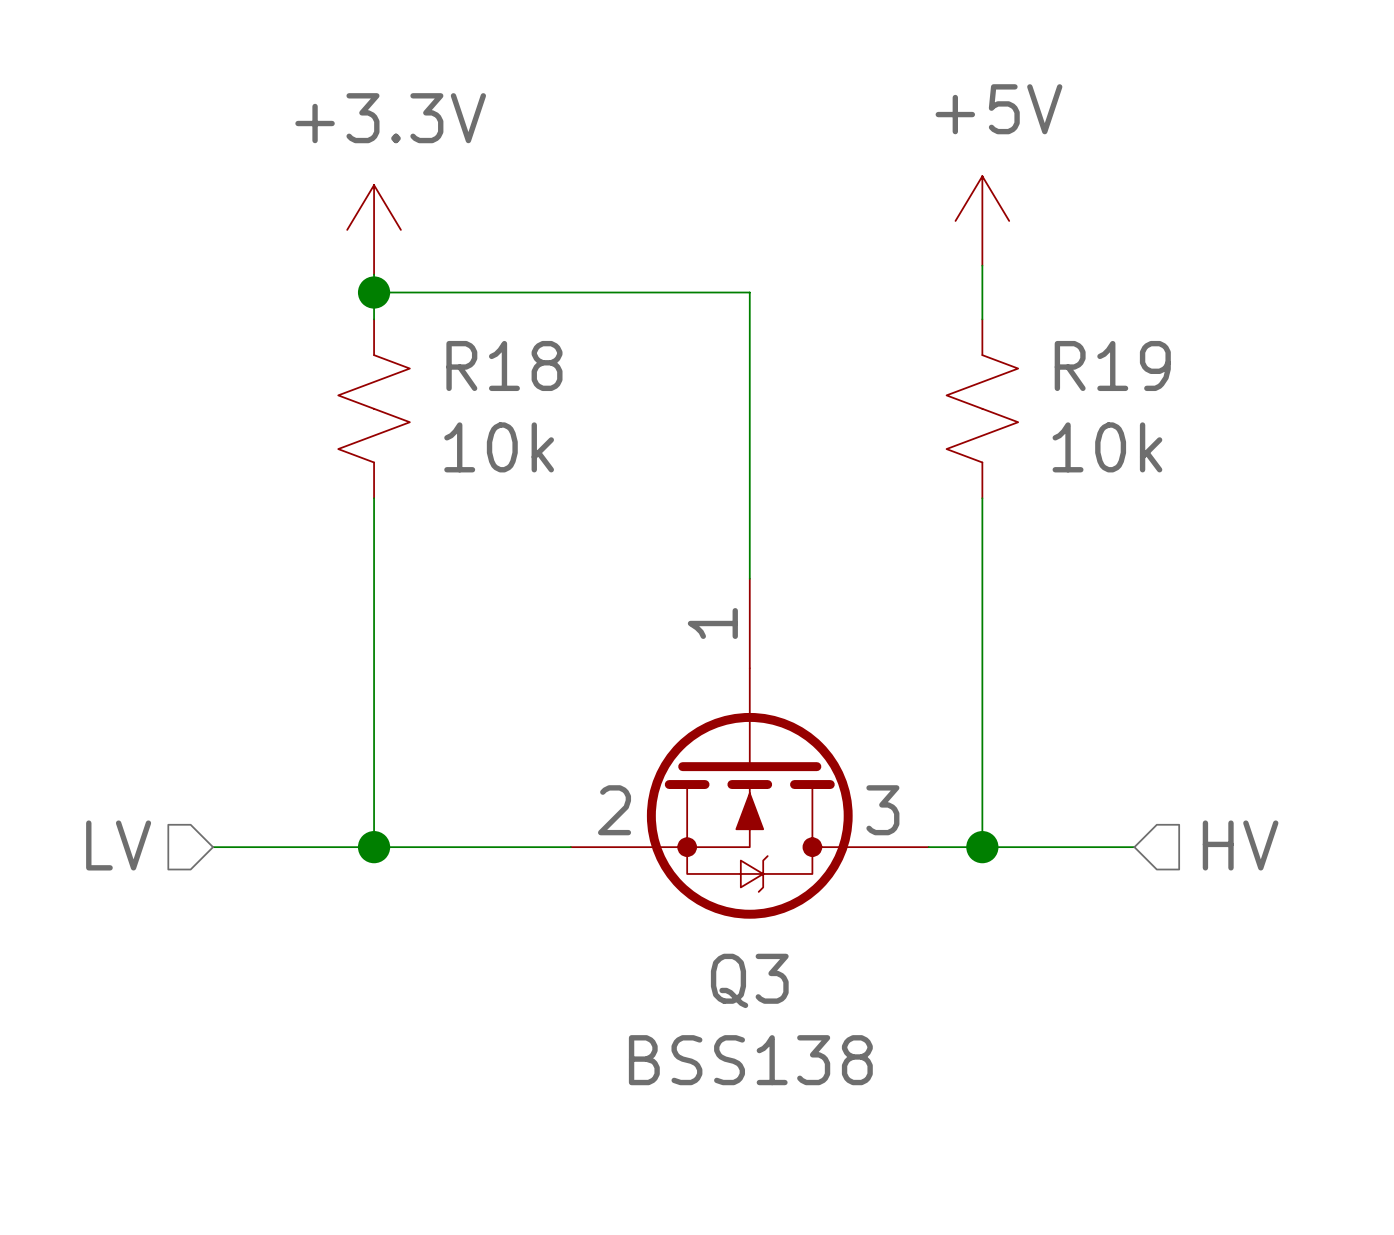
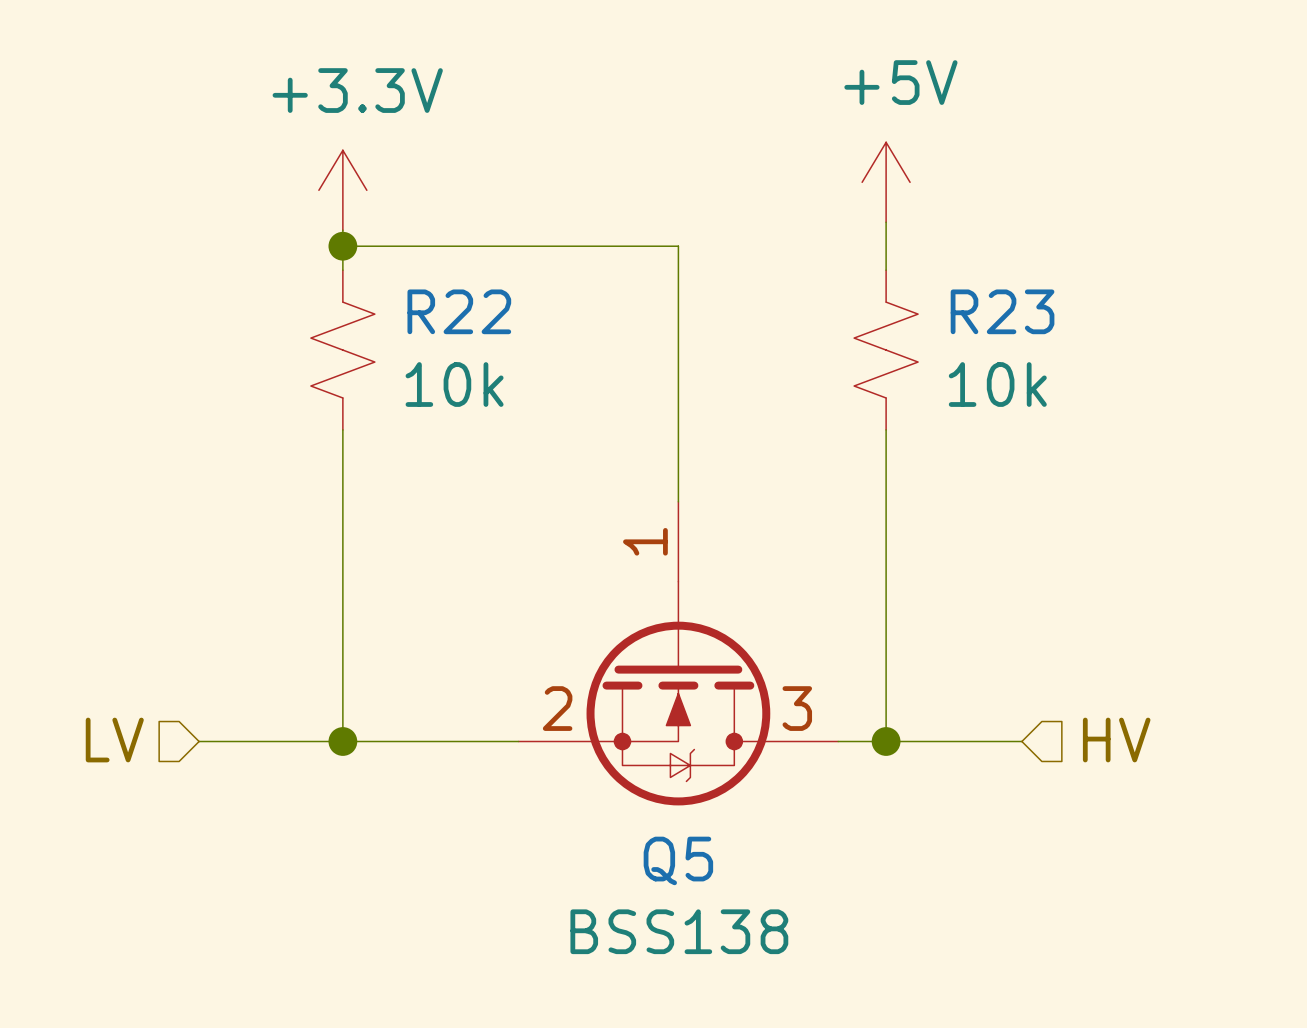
R18 name: R18 (504, 365) -> R22 (459, 311)
R19 name: R19 (1112, 365) -> R23 (1002, 311)
Q3 name: Q3 (749, 980) -> Q5 (678, 860)

